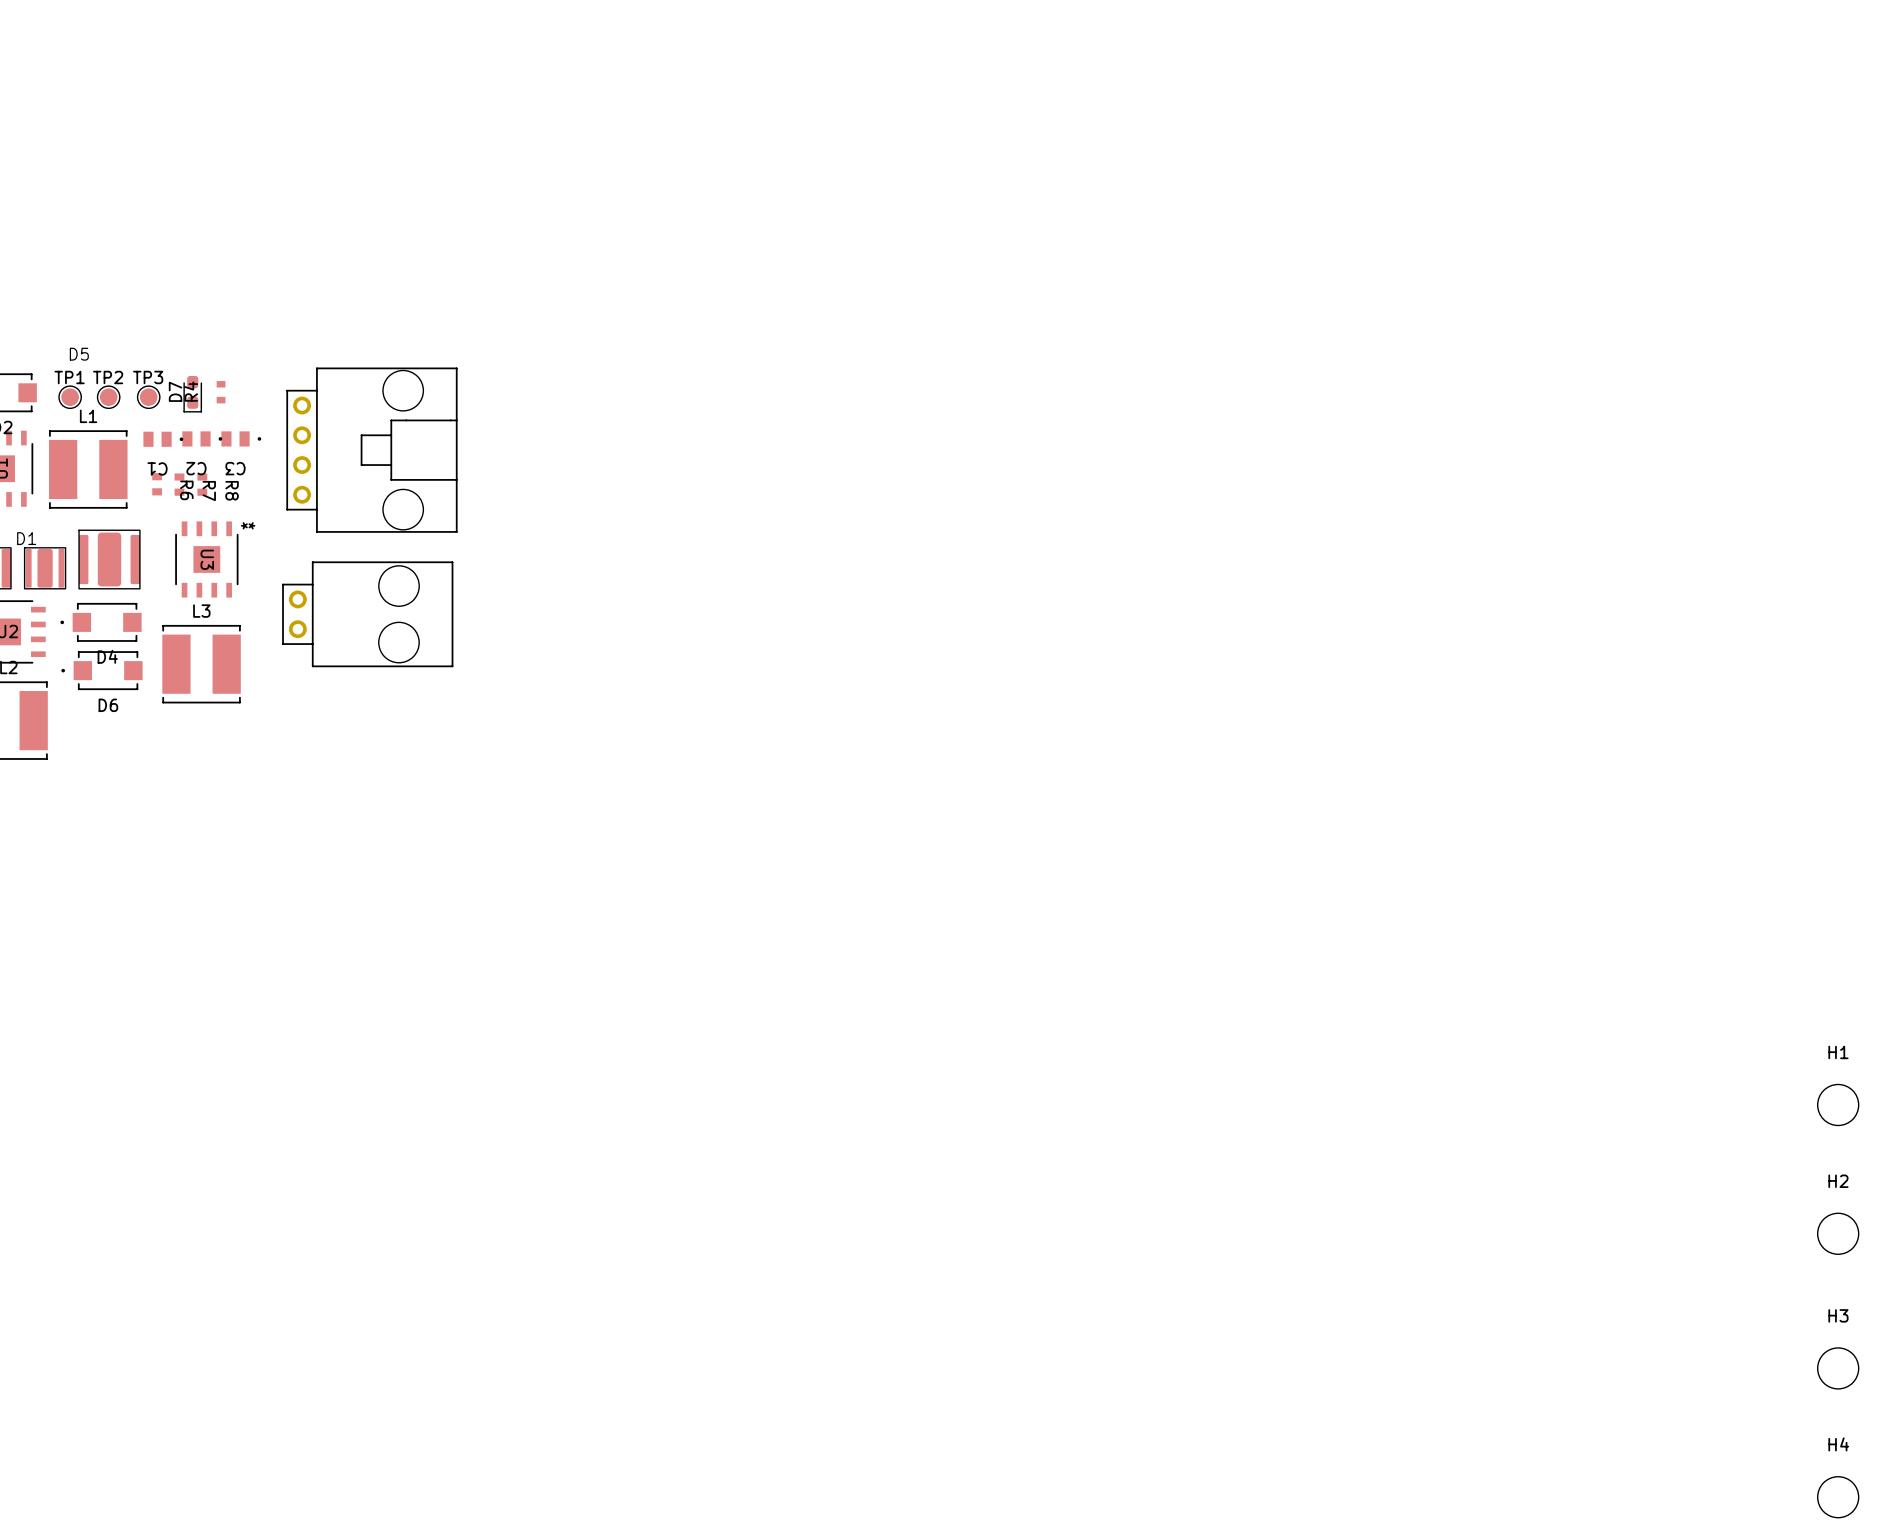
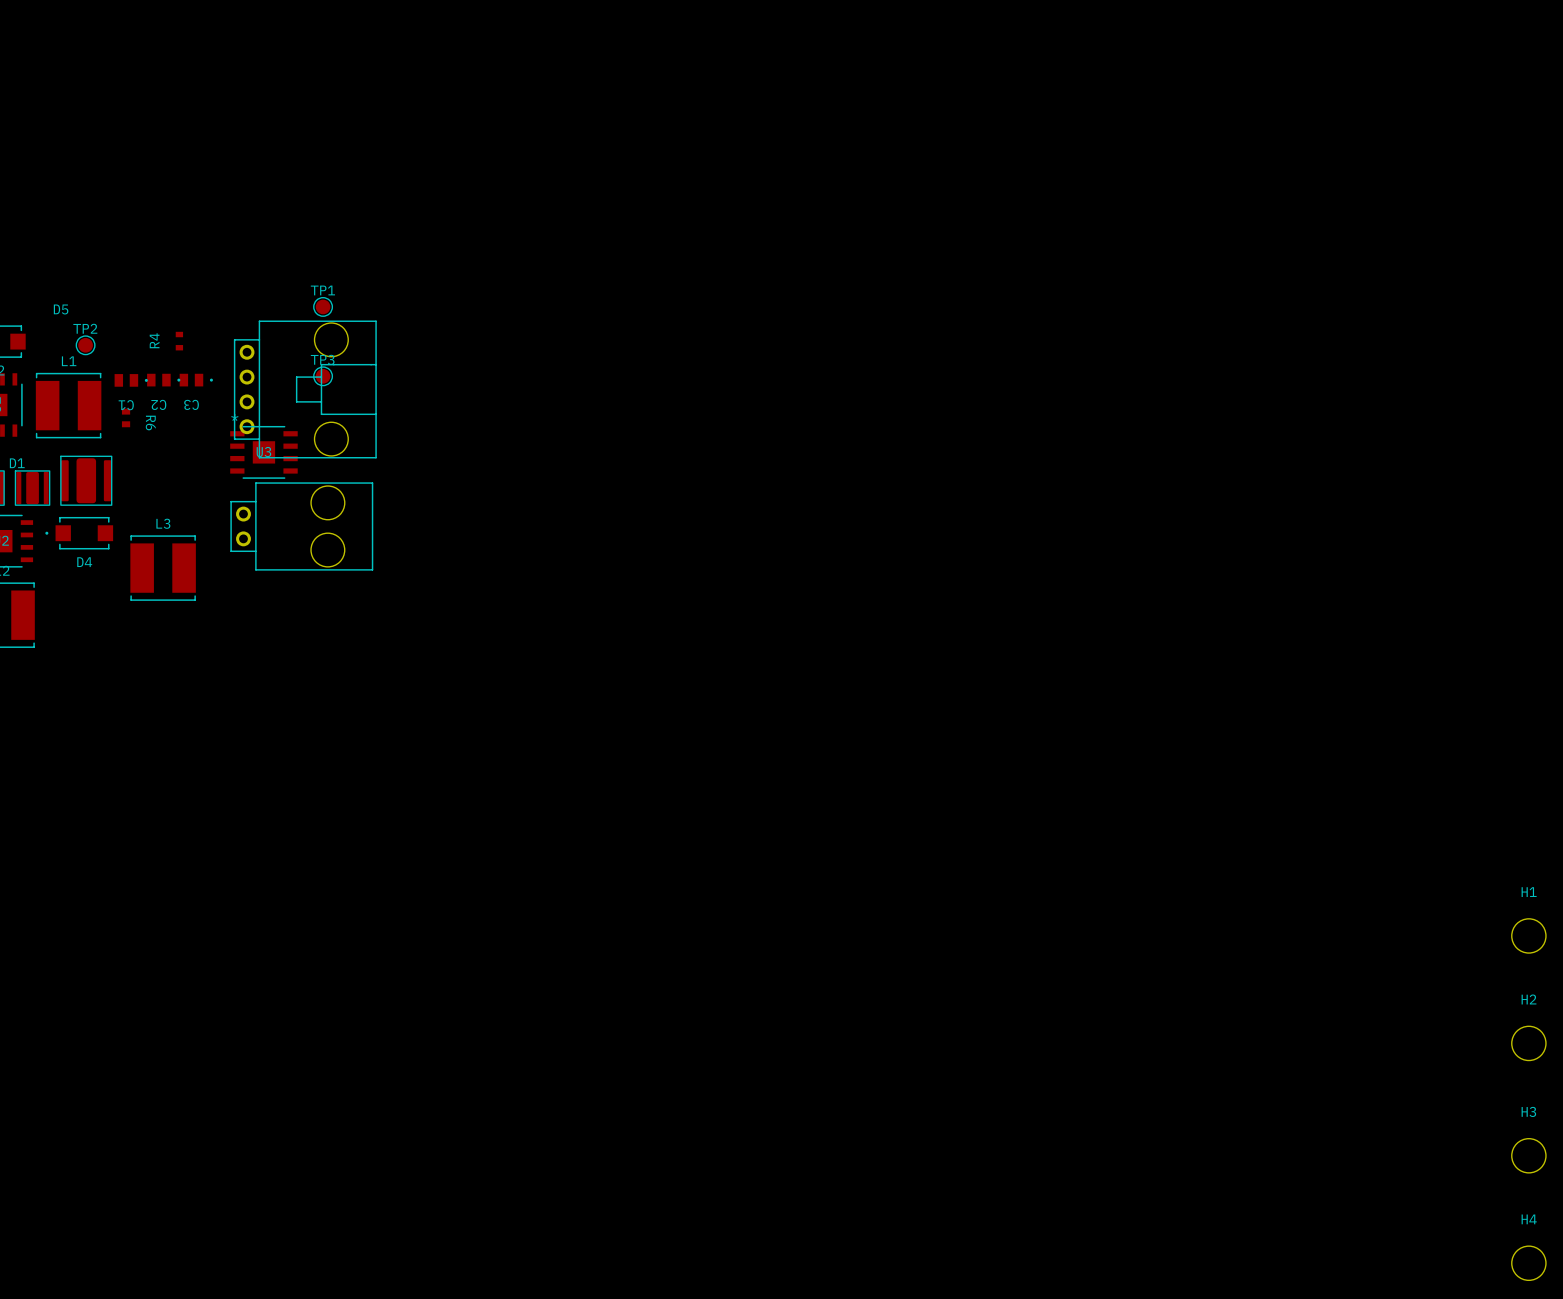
D7: (192, 394) -> none
TP1 position: (70, 397) -> (323, 306)
TP3 position: (148, 397) -> (323, 376)
R7: (179, 484) -> none
R8: (202, 484) -> none
U3 footprint: [175, 521, 239, 598] -> [230, 425, 298, 479]
D6: (101, 670) -> none

